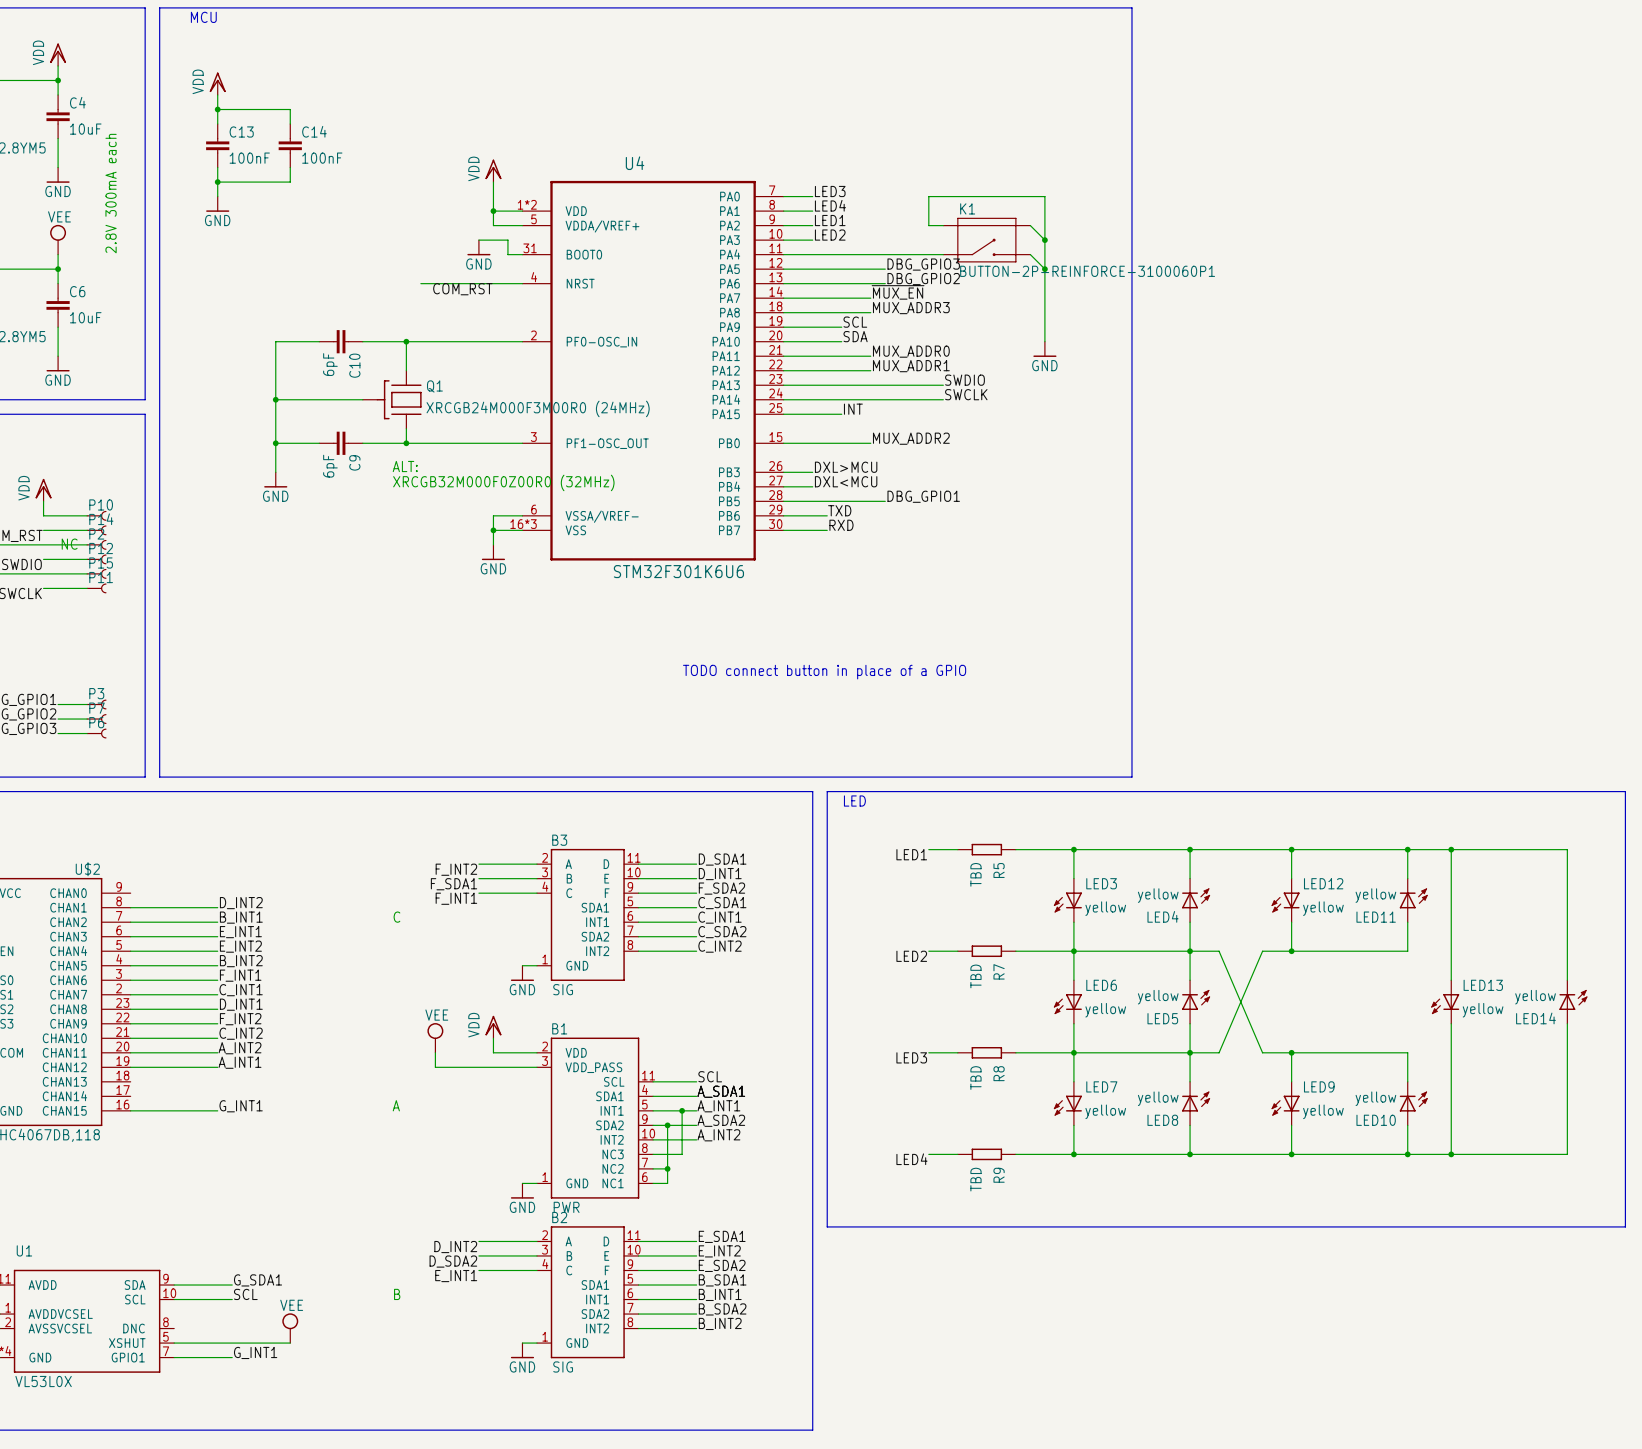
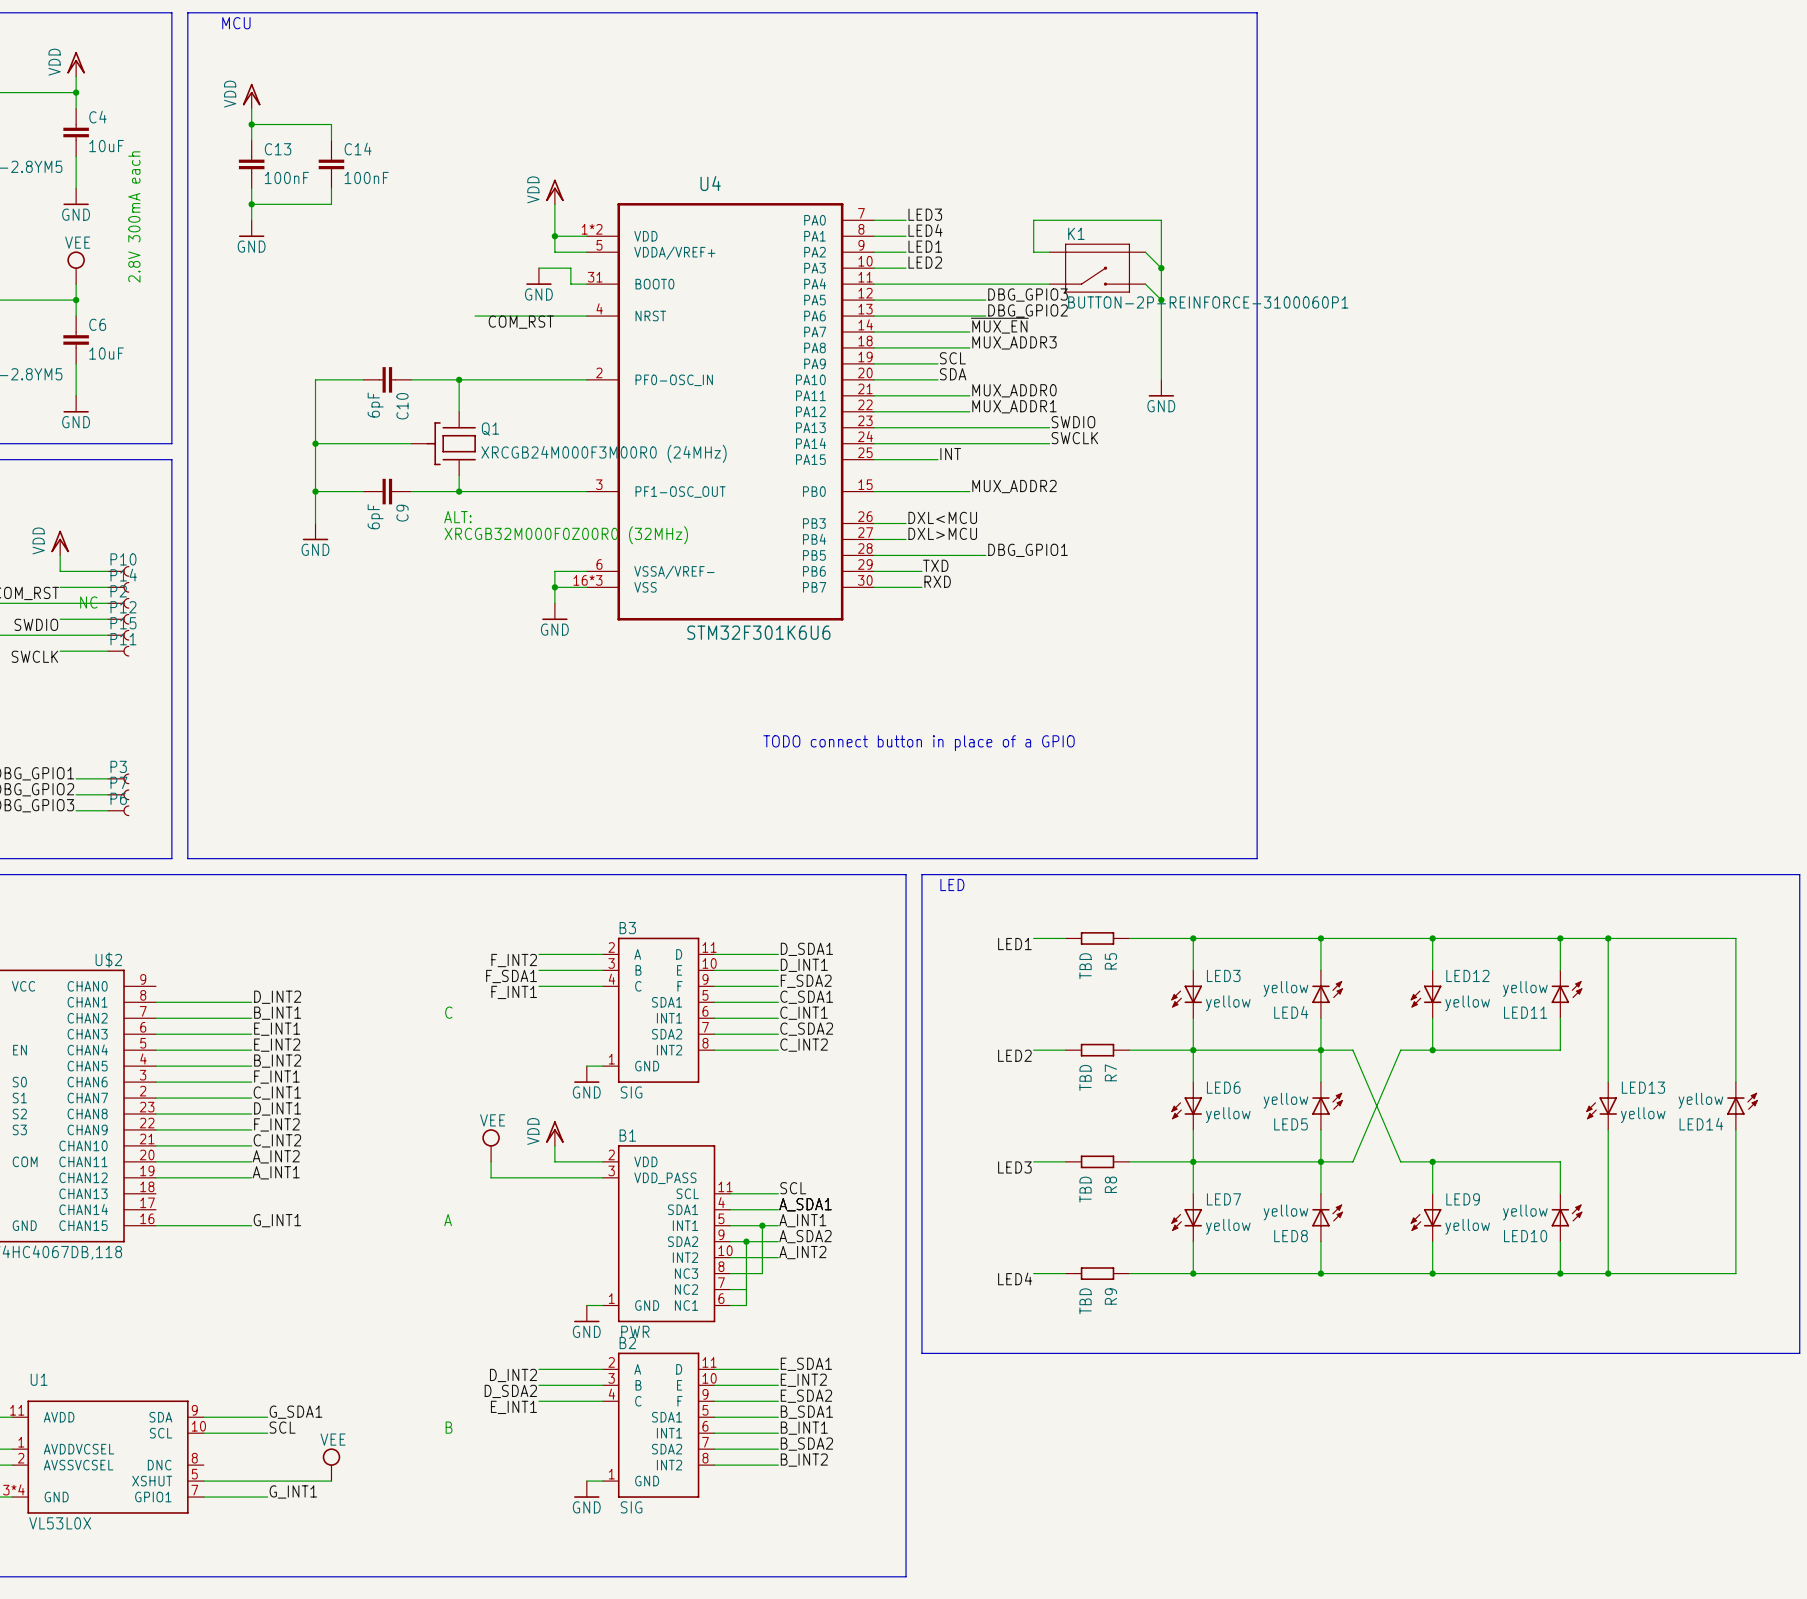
label: DXL>MCU (846, 467) -> DXL<MCU (942, 517)
label: DXL<MCU (846, 481) -> DXL>MCU (942, 533)
junction: (667, 1168) -> none

